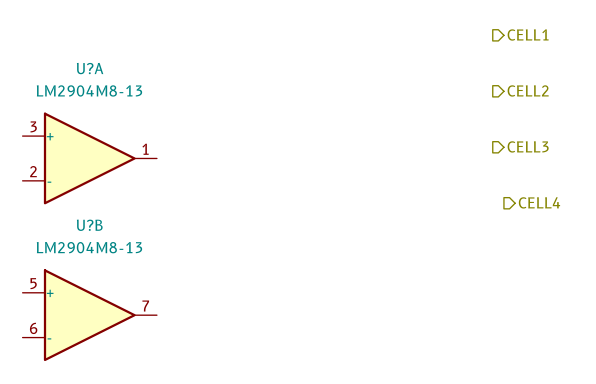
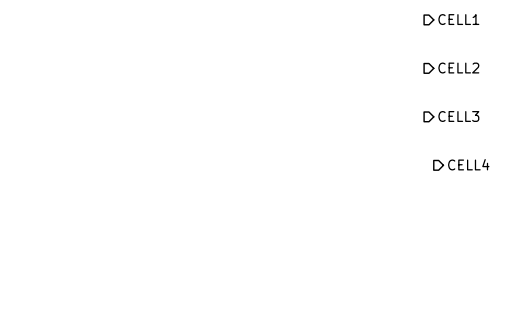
U?A: LM2904M8-13 (89, 158) -> none
U?B: LM2904M8-13 (89, 315) -> none

